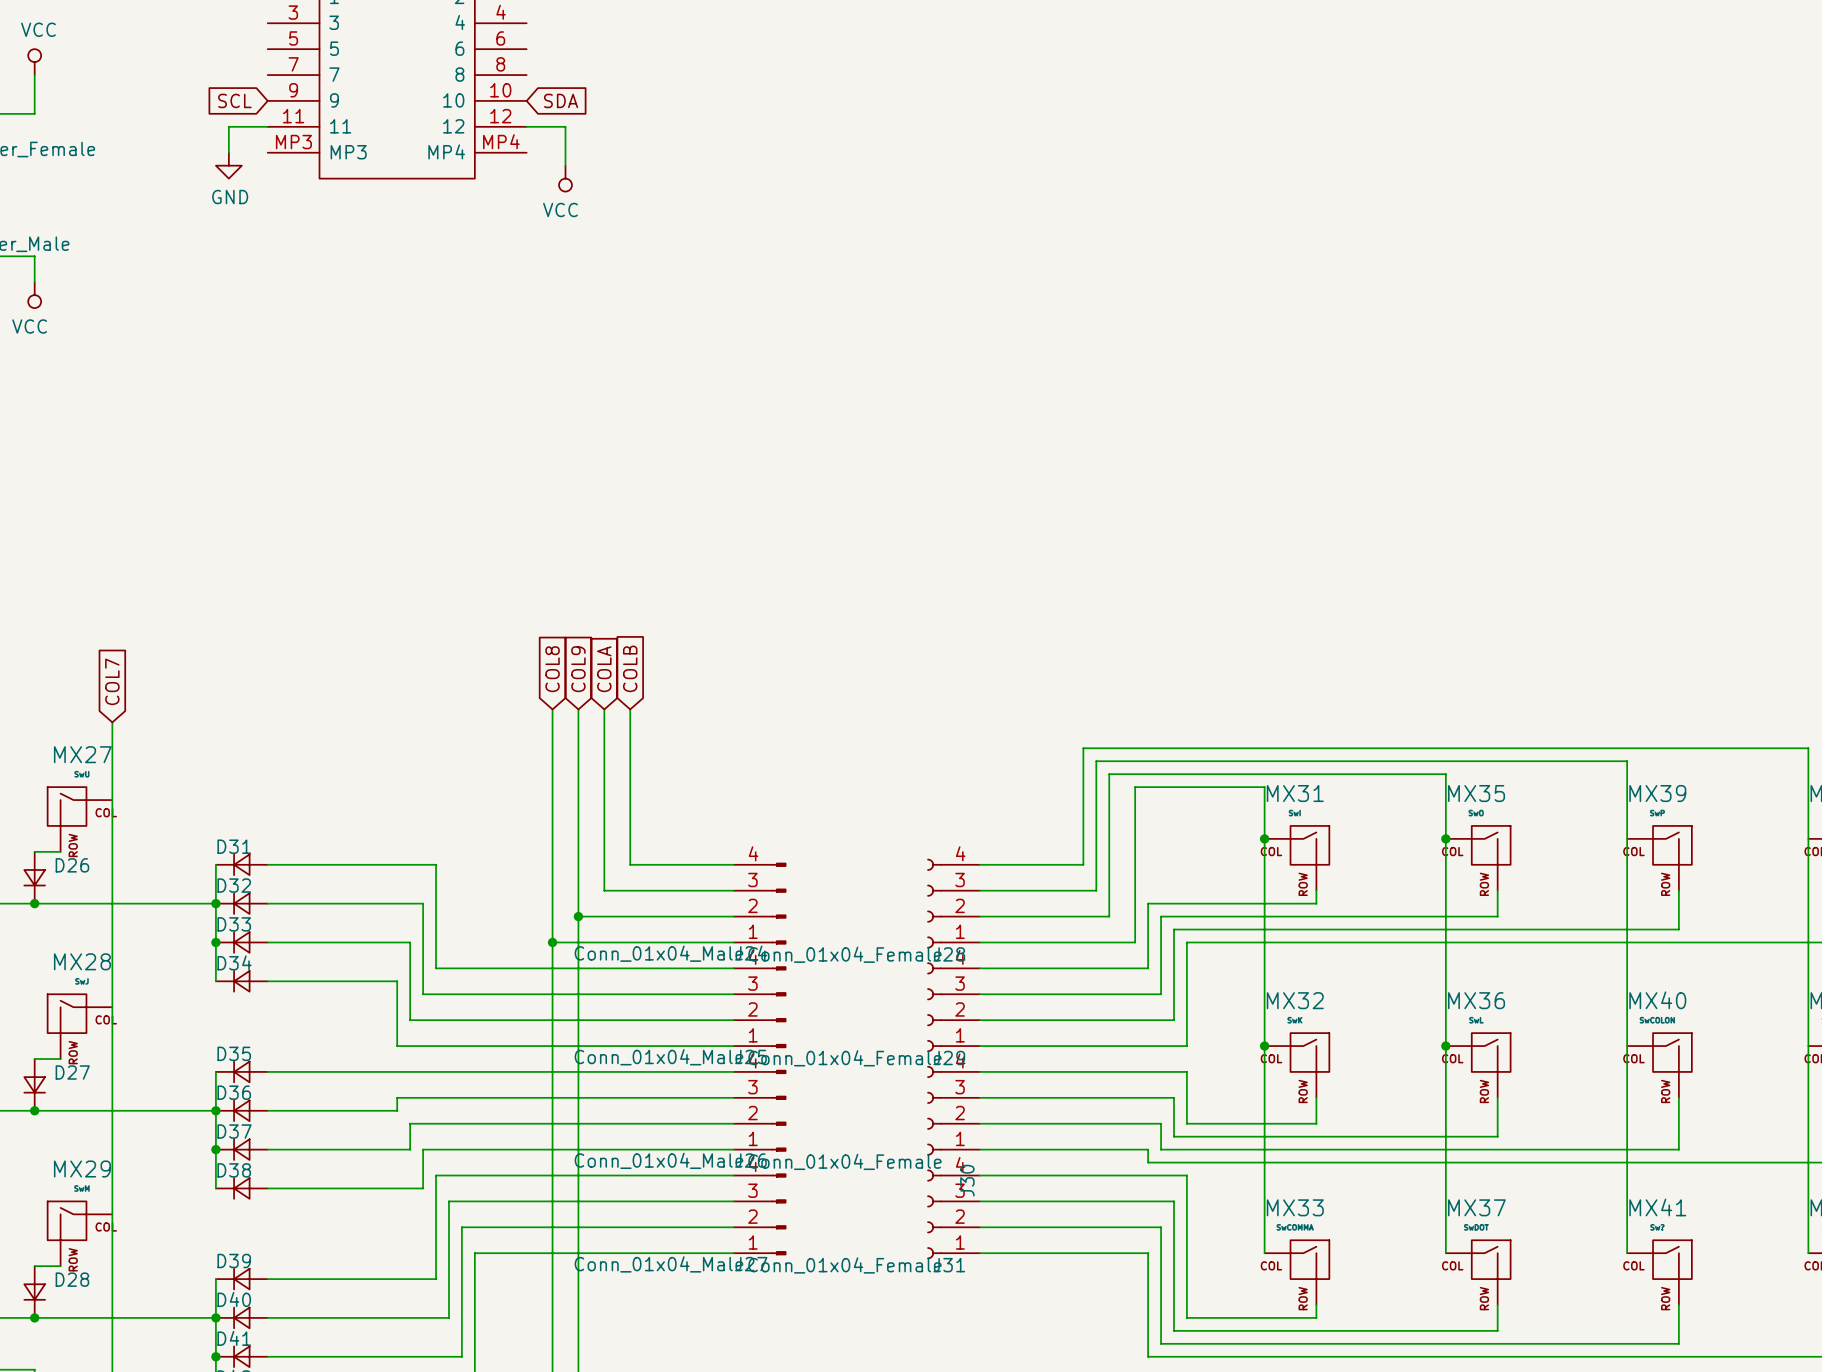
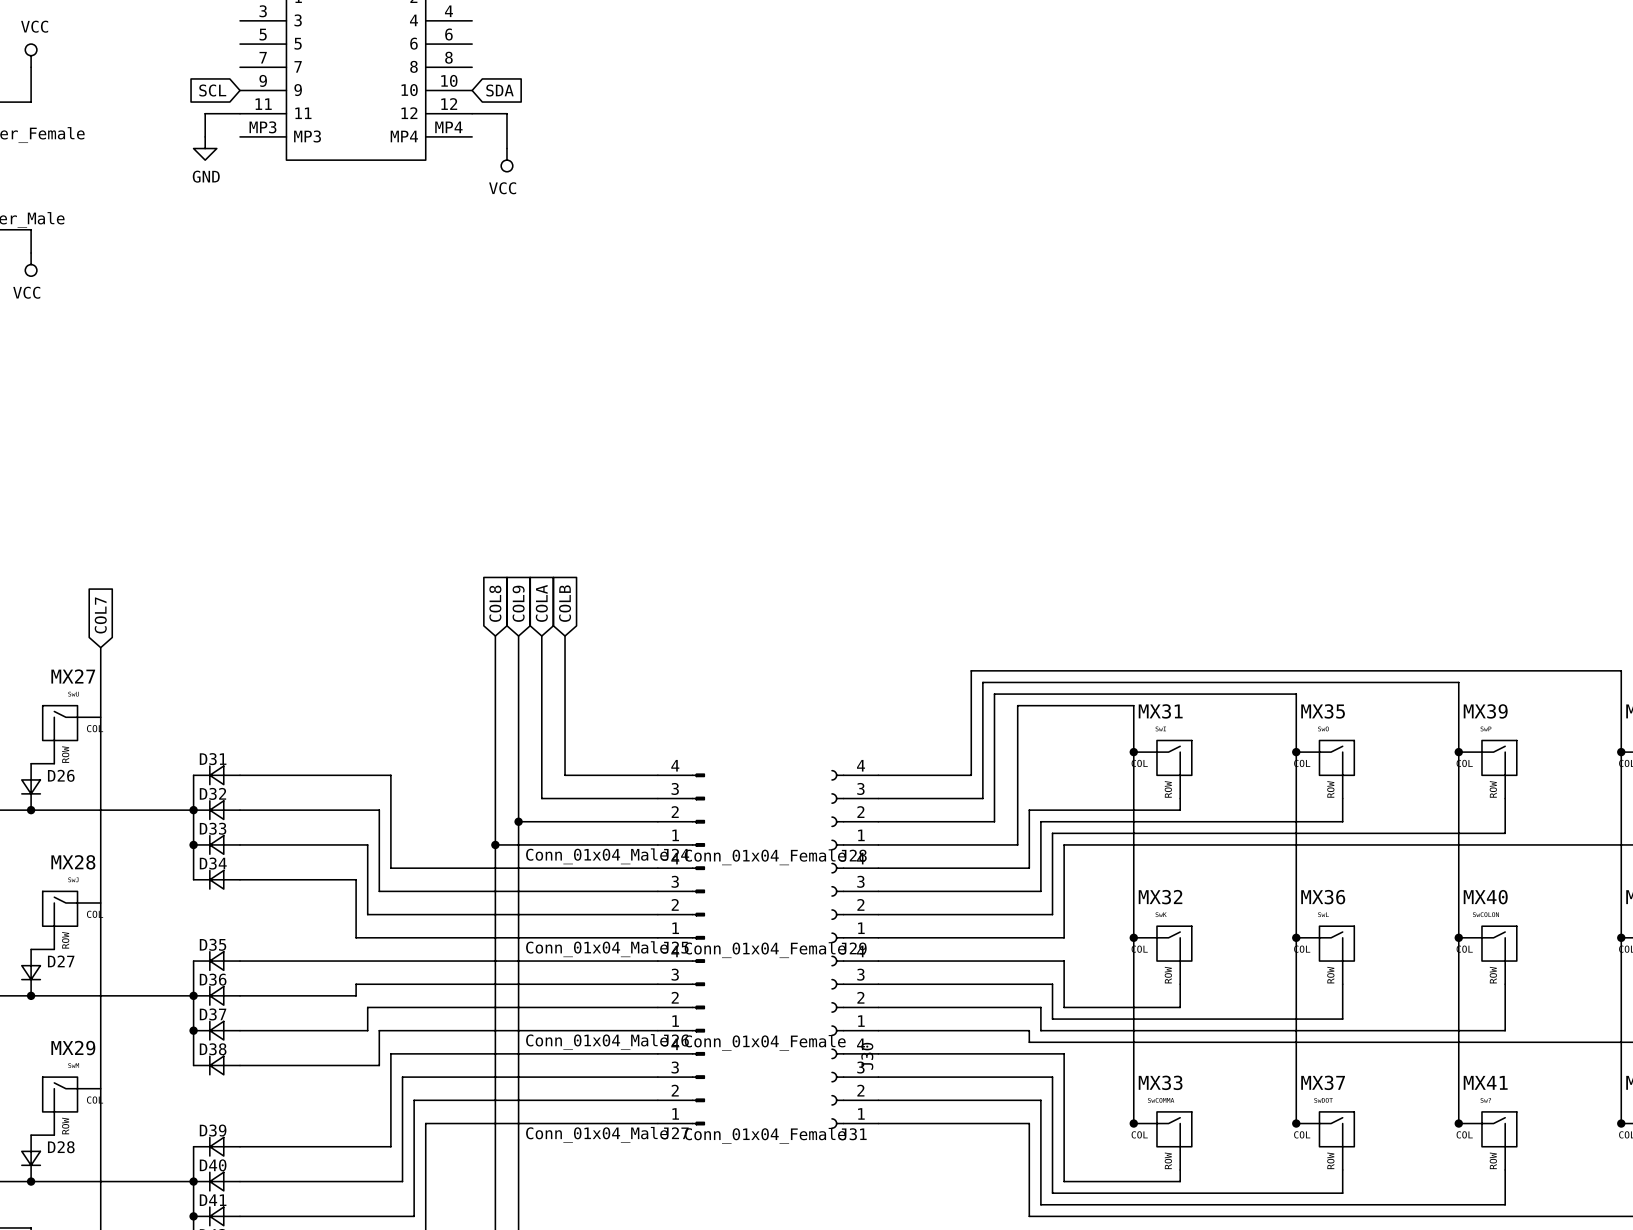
junction: none -> (1458, 752)
junction: none -> (1621, 752)
junction: none -> (1458, 937)
junction: none -> (1621, 937)
junction: none -> (1133, 1123)
junction: none -> (1296, 1123)
junction: none -> (1458, 1123)
junction: none -> (1621, 1123)

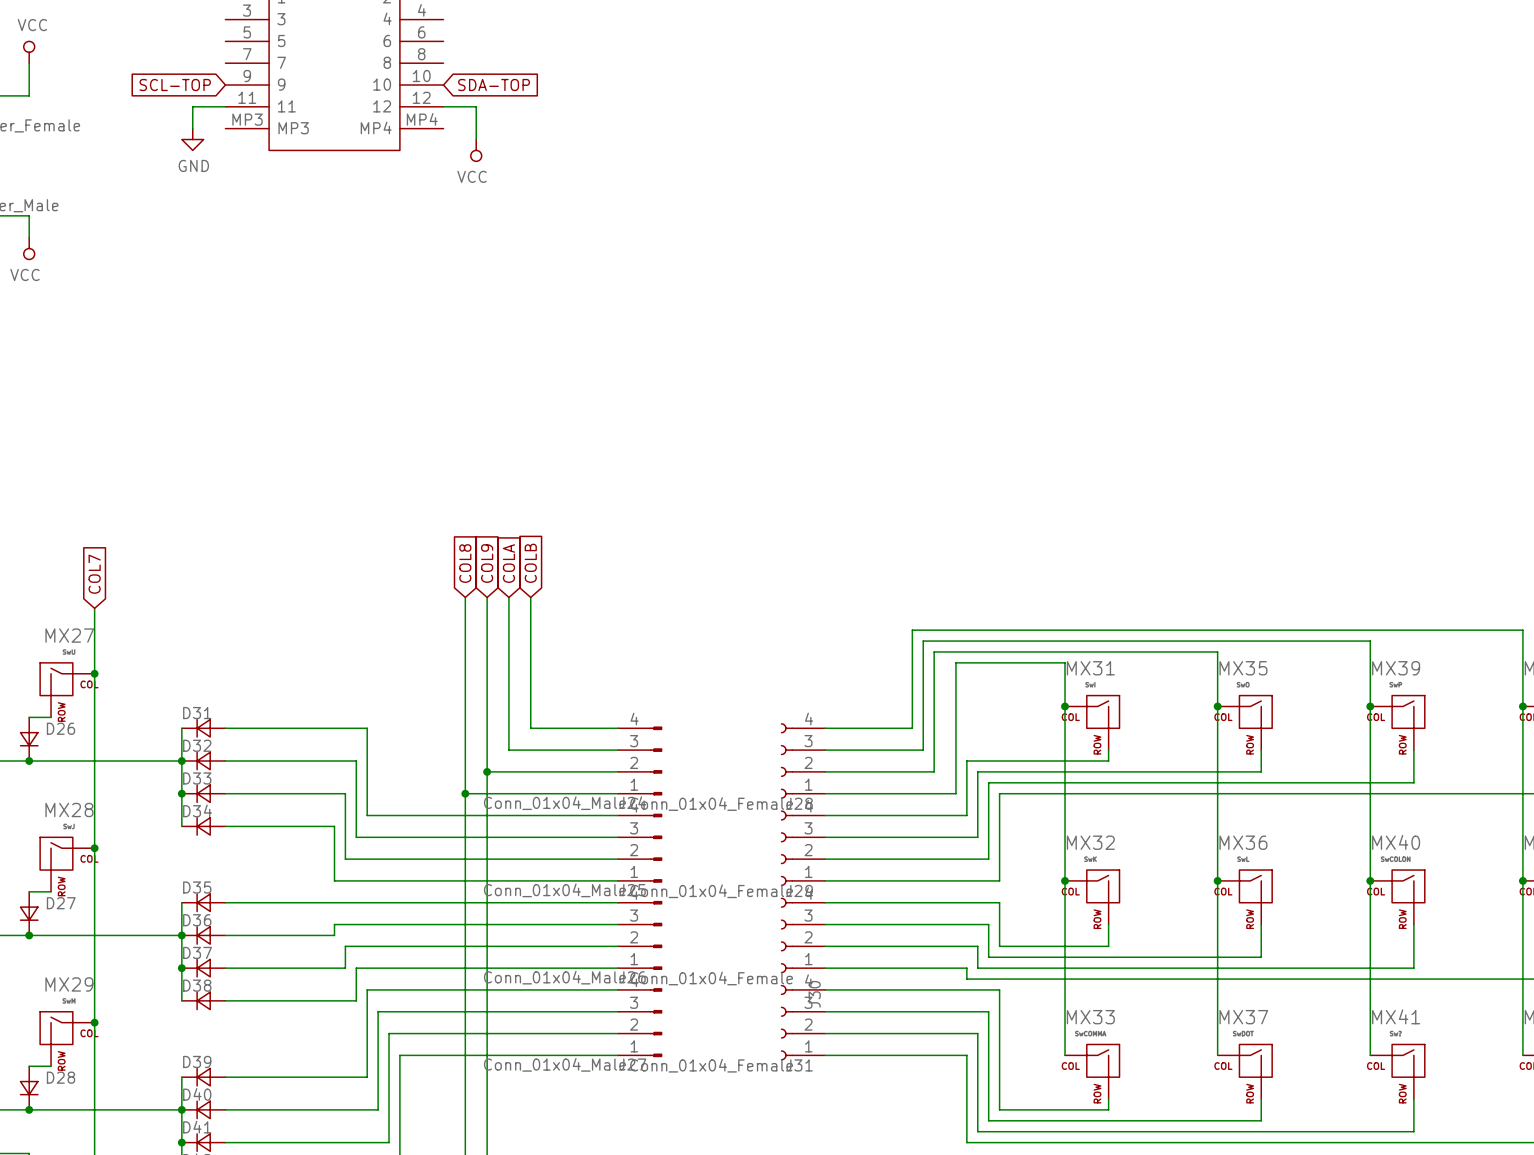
global label: SCL (212, 90) -> SCL-TOP (175, 85)
global label: SDA (499, 90) -> SDA-TOP (494, 85)
junction: none -> (94, 673)
junction: none -> (94, 848)
junction: none -> (94, 1022)
junction: (1133, 1123) -> none
junction: (1296, 1123) -> none
junction: (1458, 1123) -> none
junction: (1621, 1123) -> none

